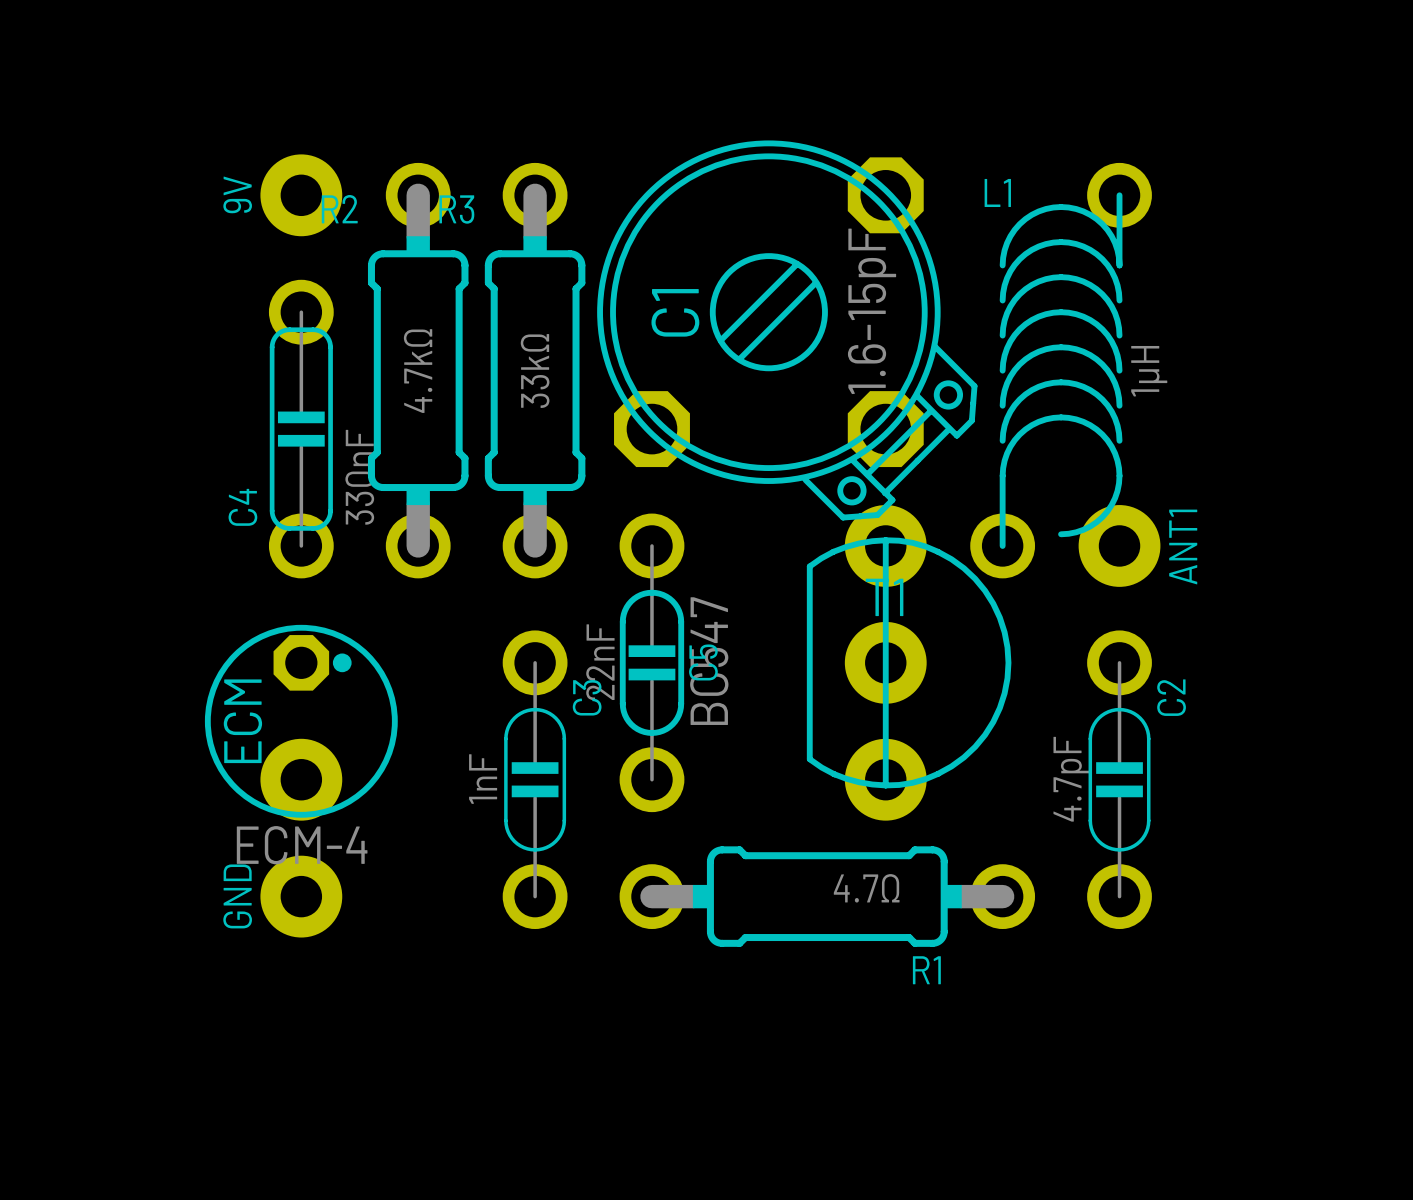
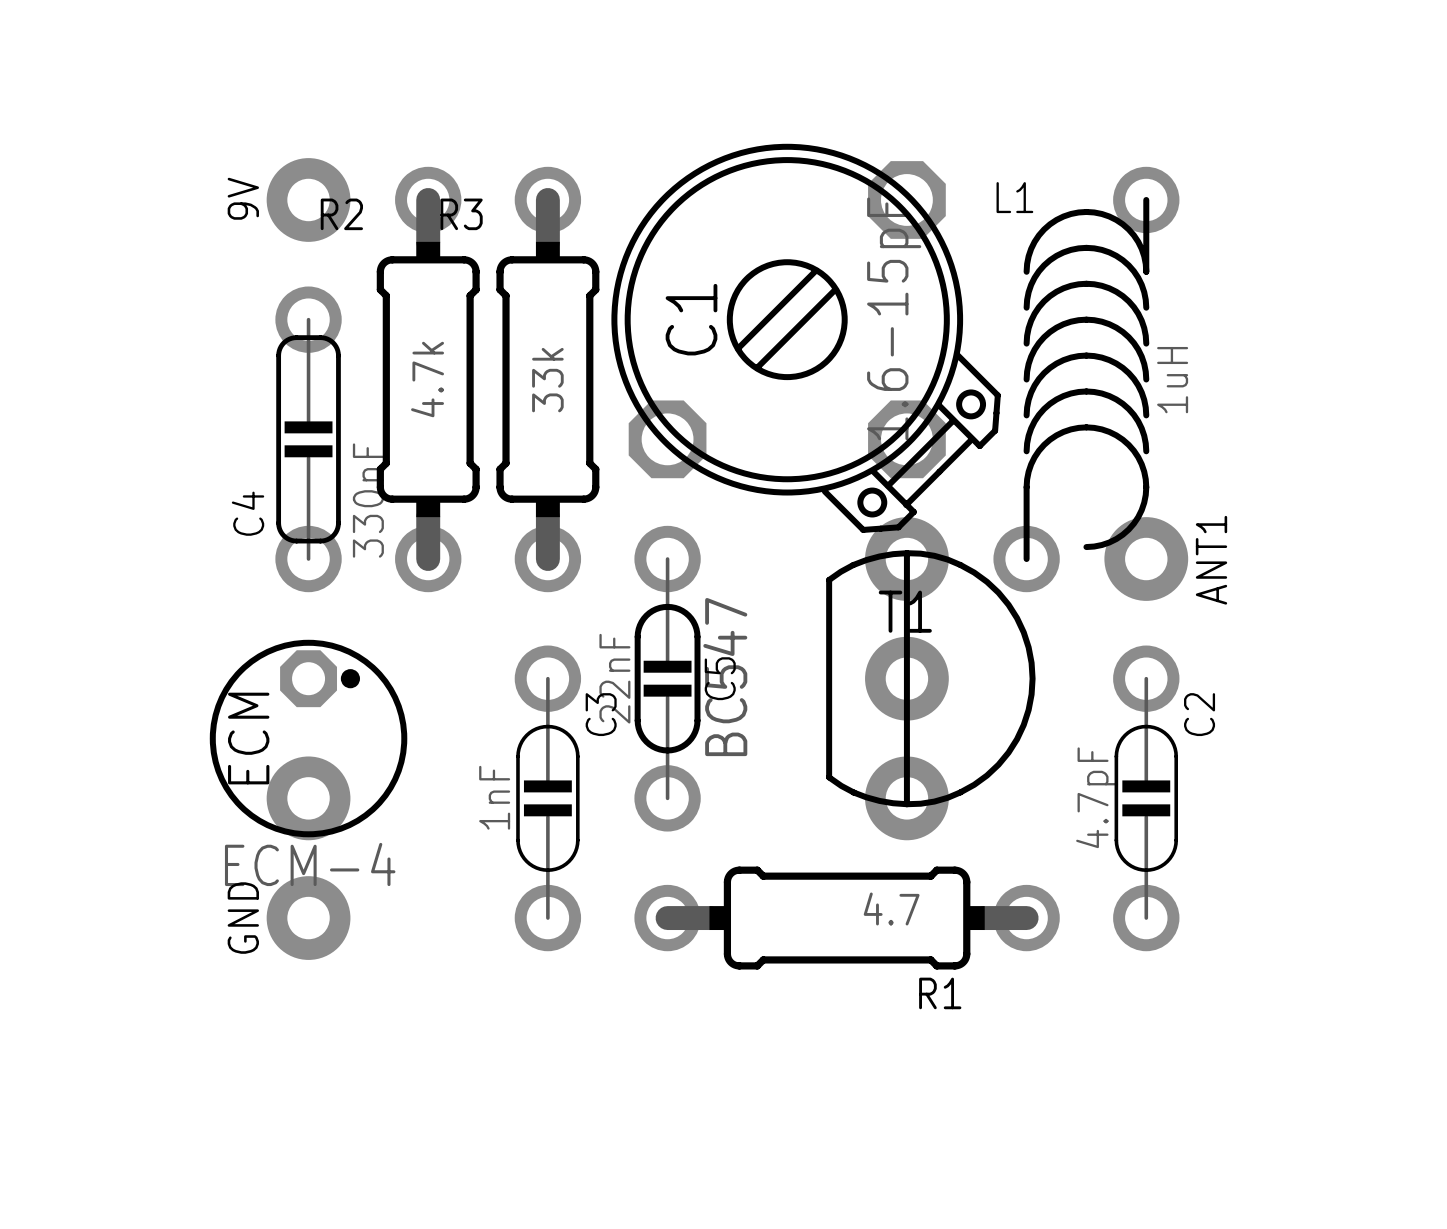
R2 value: 4.7kΩ (418, 371) -> 4.7k (427, 379)
R3 value: 33kΩ (535, 371) -> 33k (547, 380)
L1 value: 1μH (1149, 371) -> 1uH (1172, 380)
R1 value: 4.7Ω (866, 888) -> 4.7 (891, 908)

